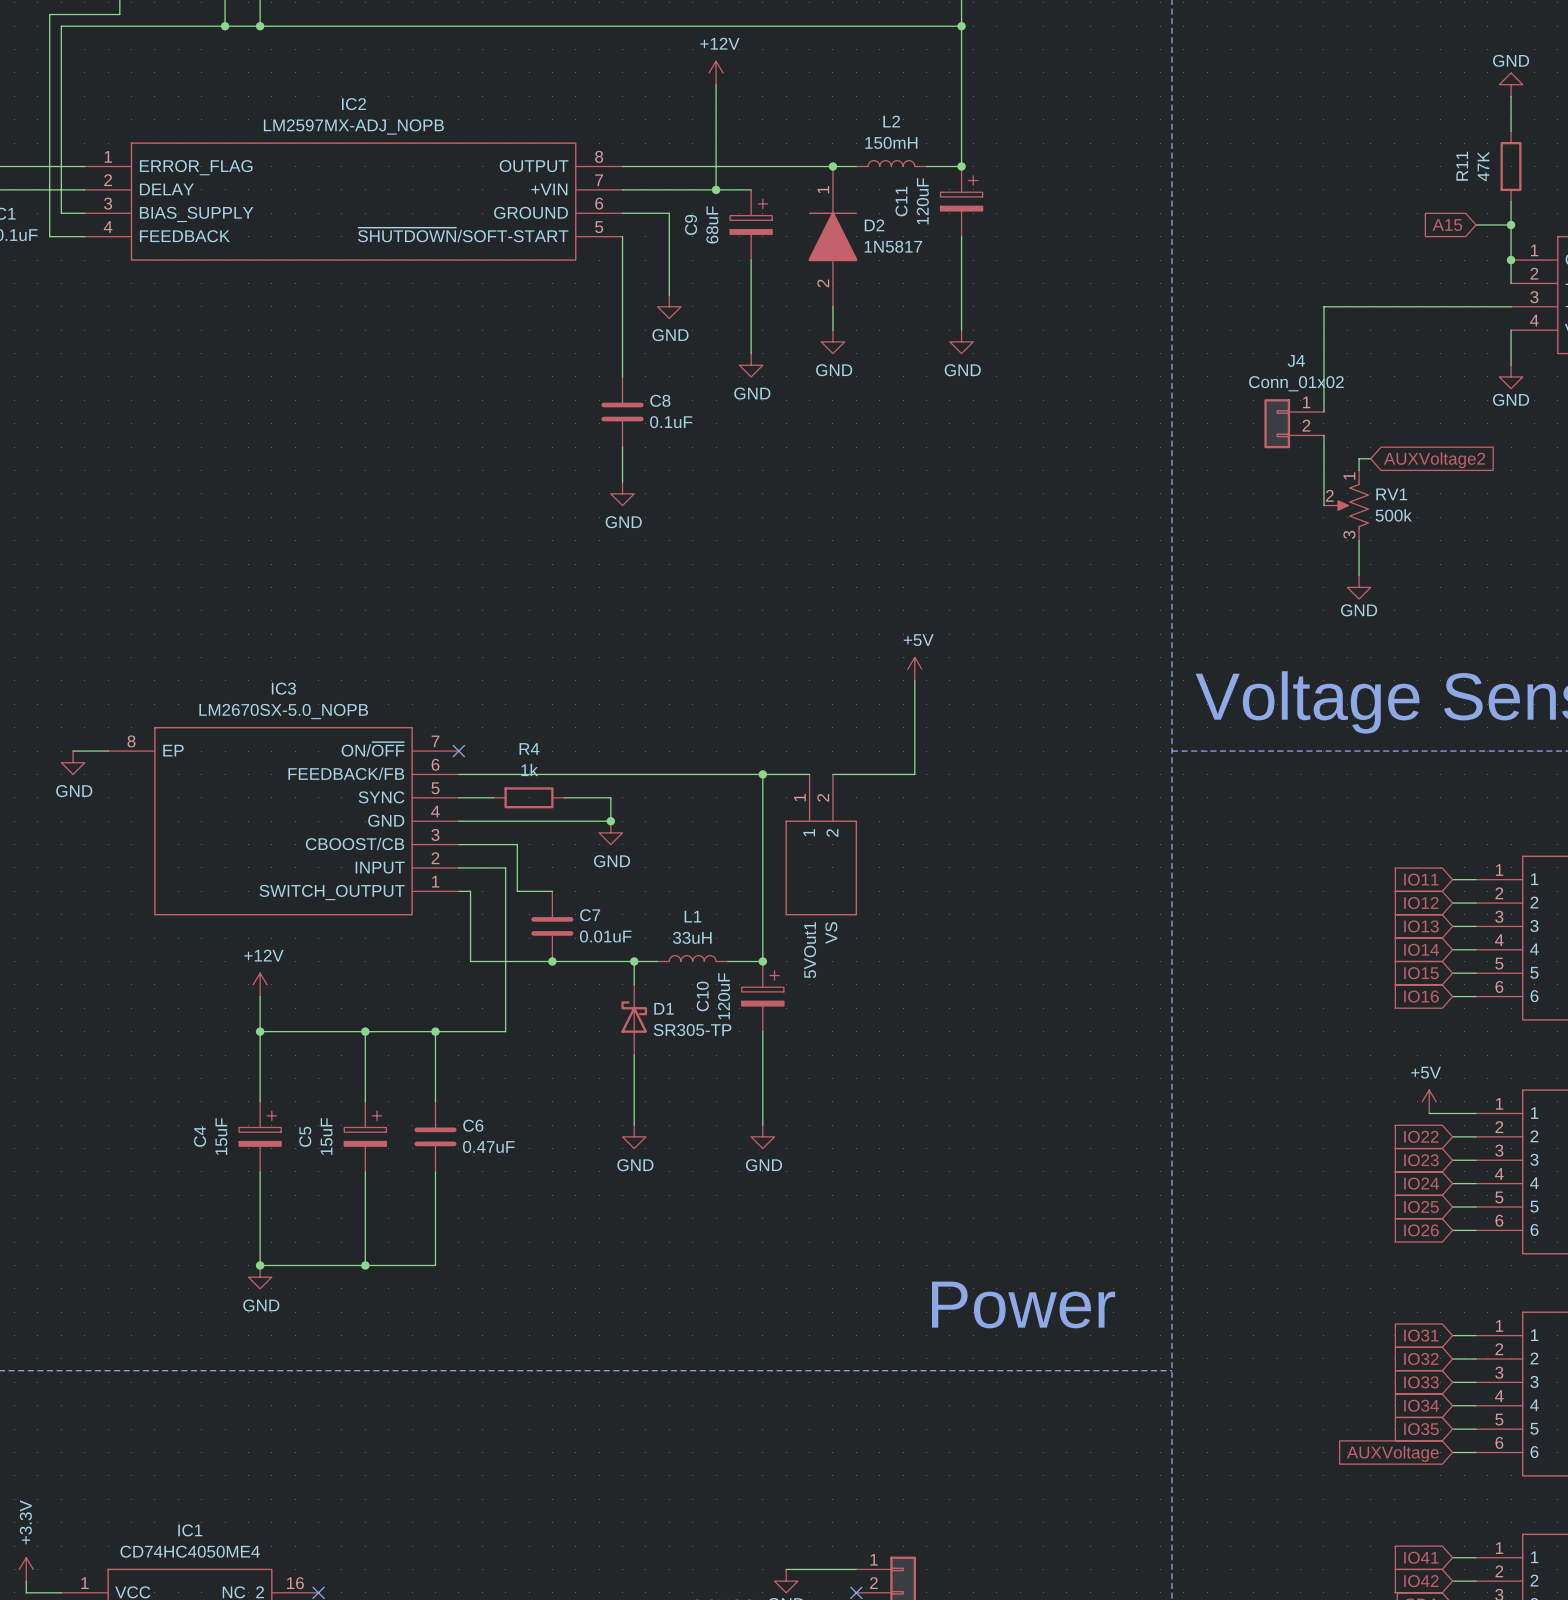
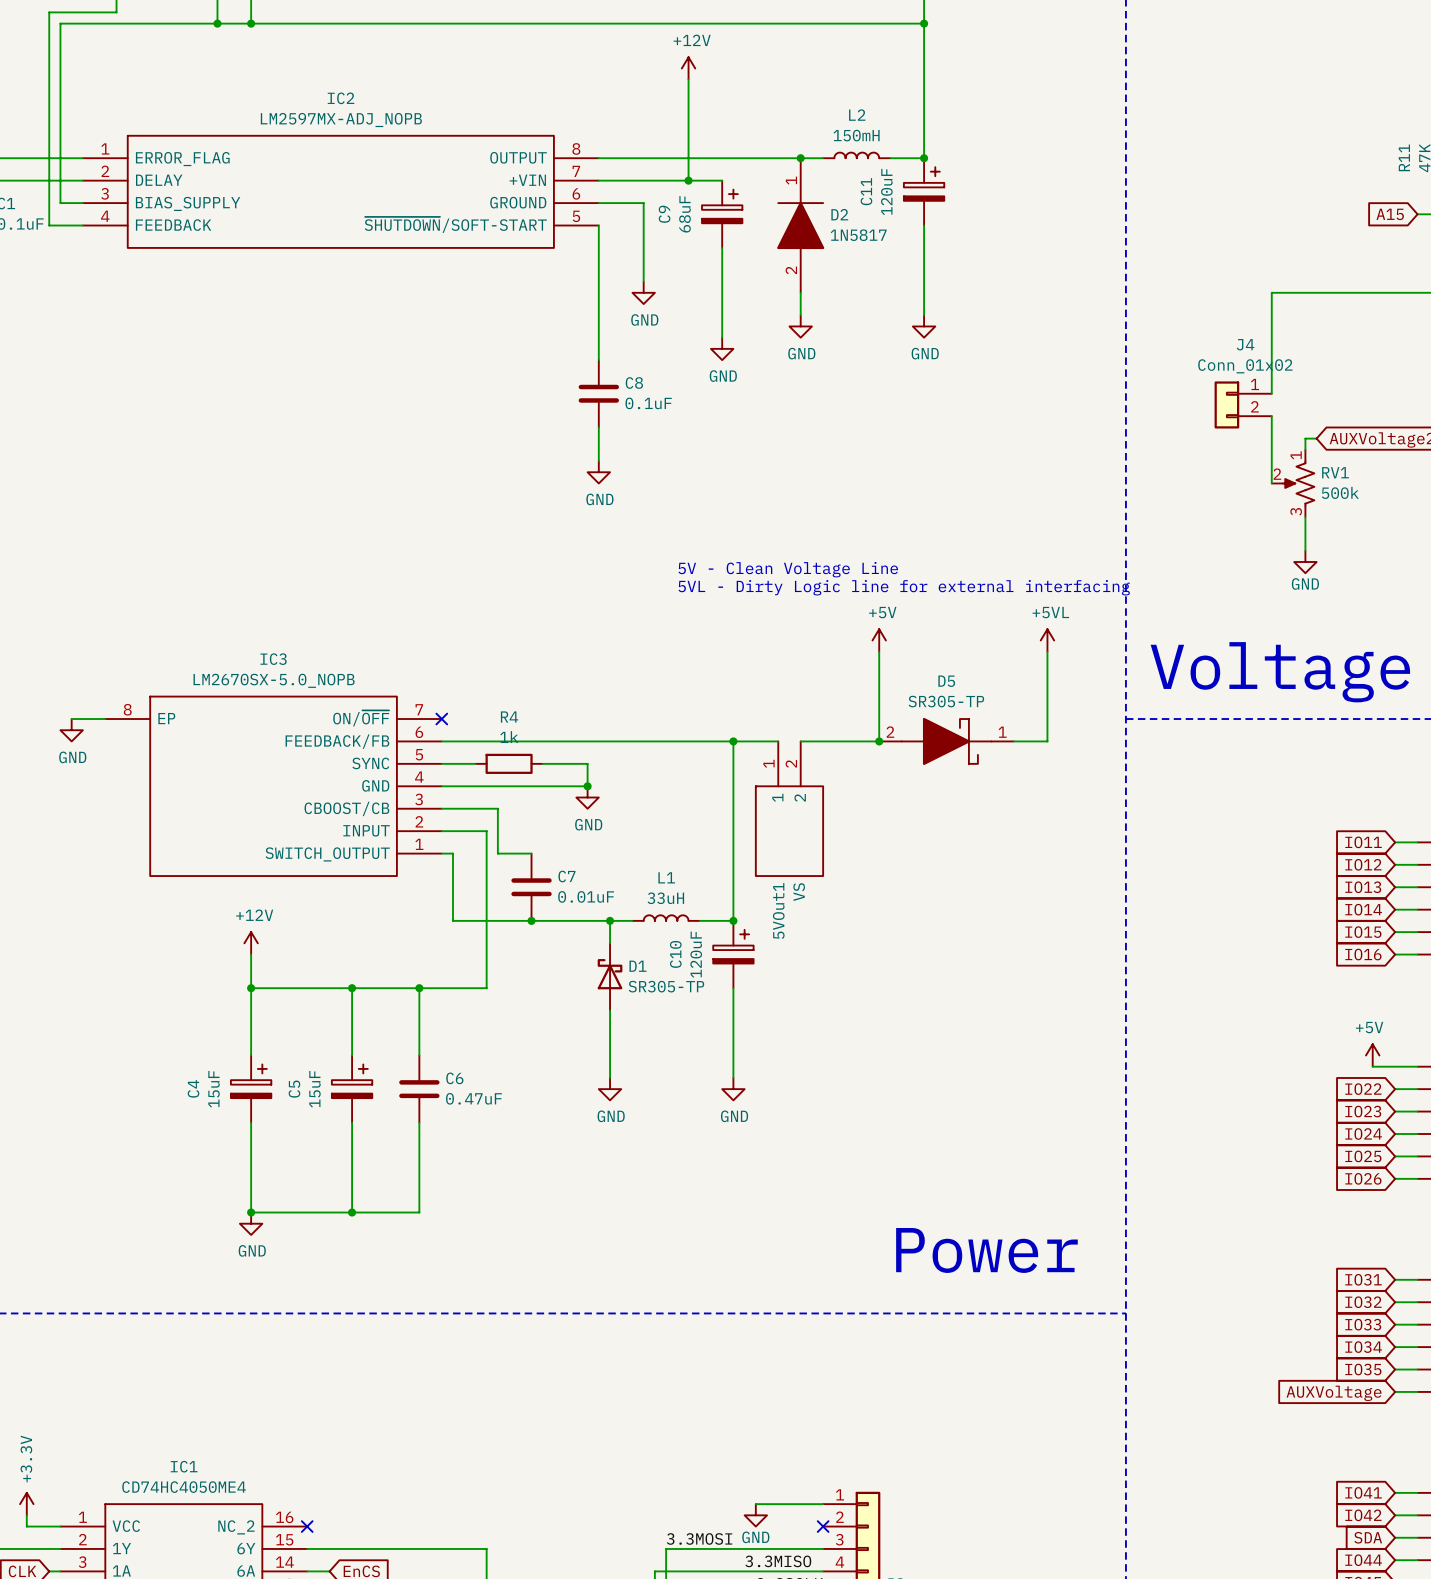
text: none -> 5V - Clean Voltage Line (788, 569)
text: none -> 5VL - Dirty Logic line for external interfacing (904, 587)
power symbol: none -> +5VL (1047, 640)
wire: none -> (1047, 651) (1047, 741) (1013, 741)
junction: none -> (879, 741)
D5: none -> SR305-TP (946, 741)

